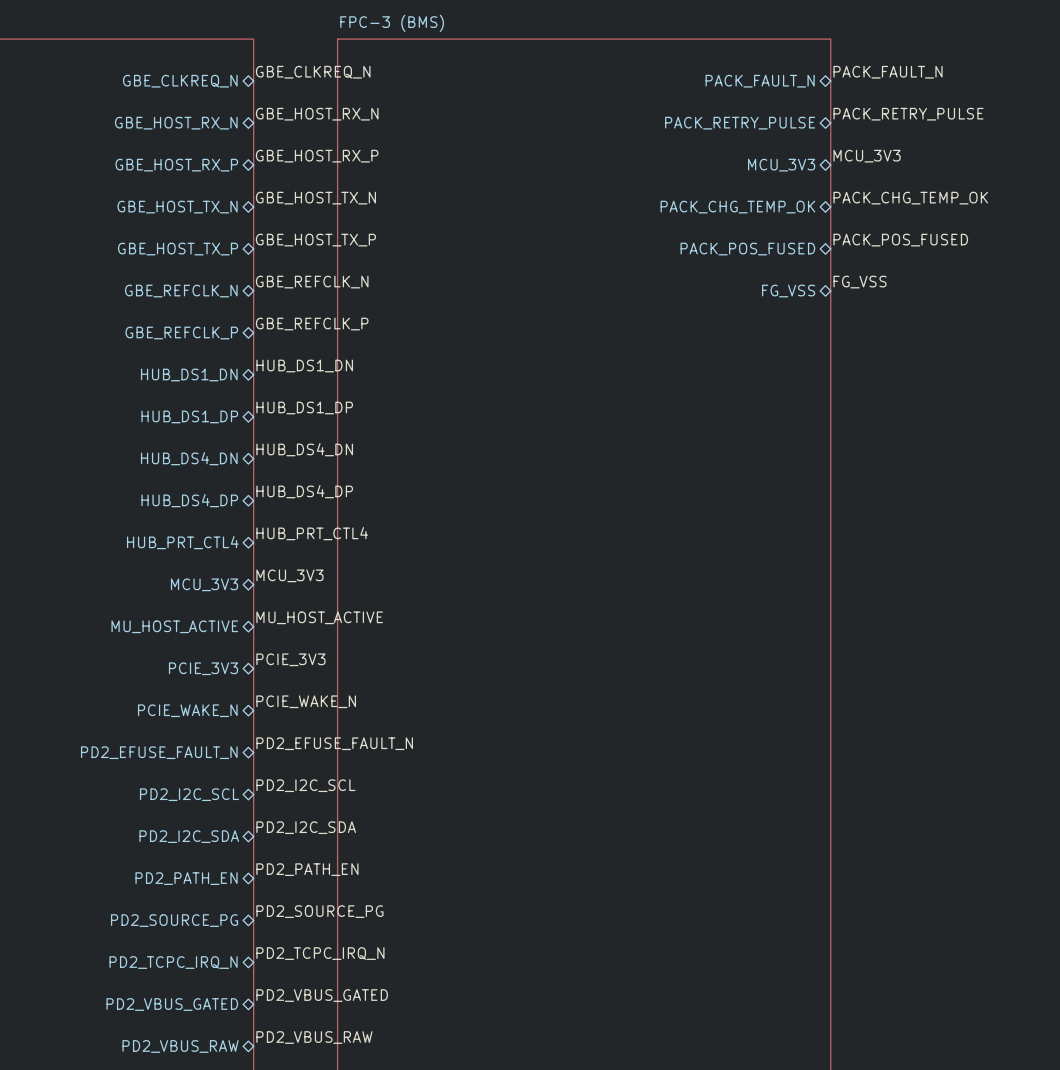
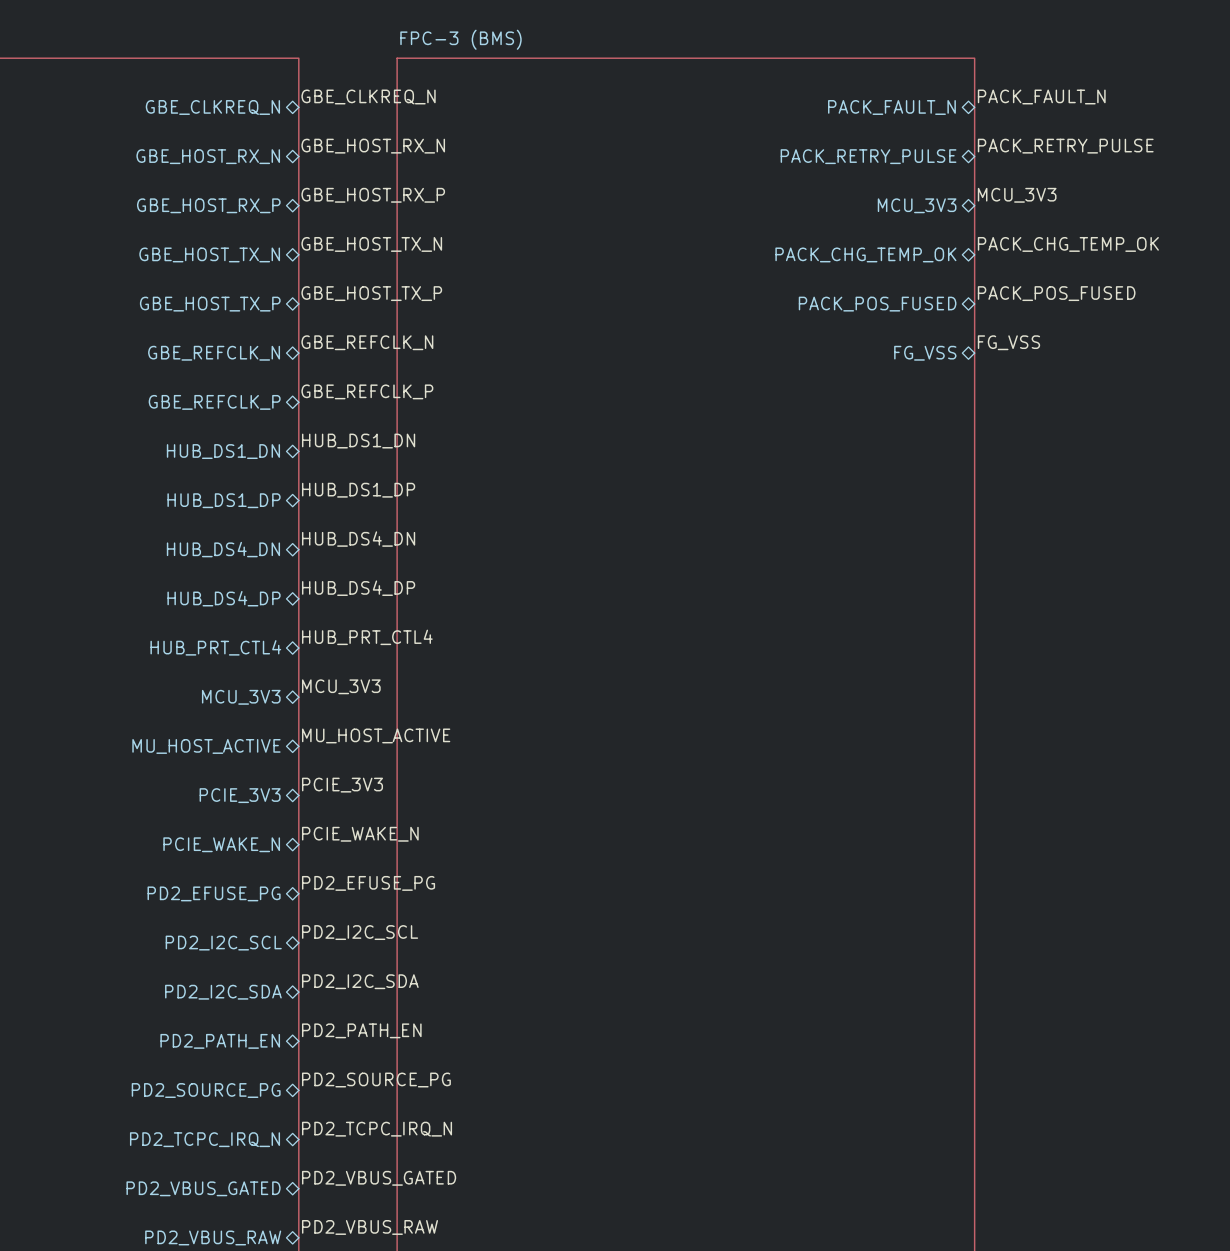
label: PD2_EFUSE_FAULT_N (334, 743) -> PD2_EFUSE_PG (368, 883)
sheet pin: PD2_EFUSE_FAULT_N (159, 752) -> PD2_EFUSE_PG (214, 893)

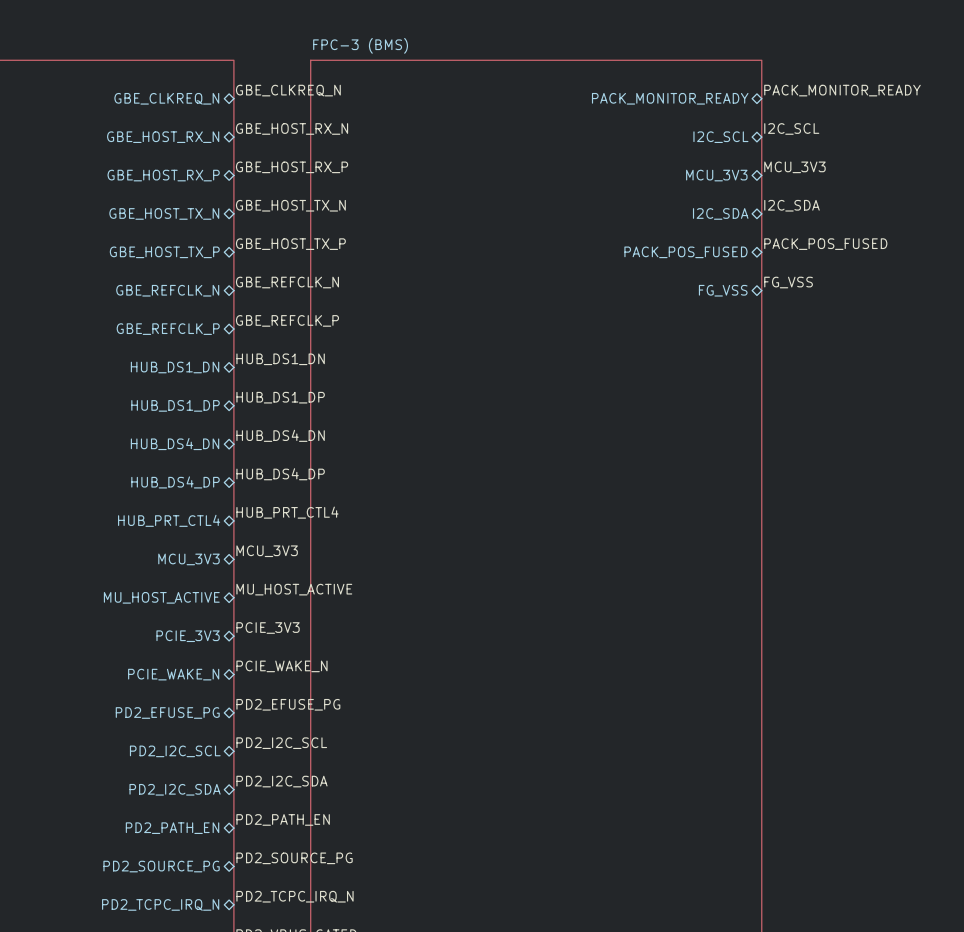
label: PACK_FAULT_N (1041, 96) -> PACK_MONITOR_READY (842, 90)
sheet pin: PACK_FAULT_N (891, 107) -> PACK_MONITOR_READY (670, 98)
label: PACK_RETRY_PULSE (1065, 146) -> I2C_SCL (791, 128)
sheet pin: PACK_RETRY_PULSE (868, 156) -> I2C_SCL (720, 137)
label: PACK_CHG_TEMP_OK (1068, 244) -> I2C_SDA (791, 205)
sheet pin: PACK_CHG_TEMP_OK (865, 254) -> I2C_SDA (720, 213)

